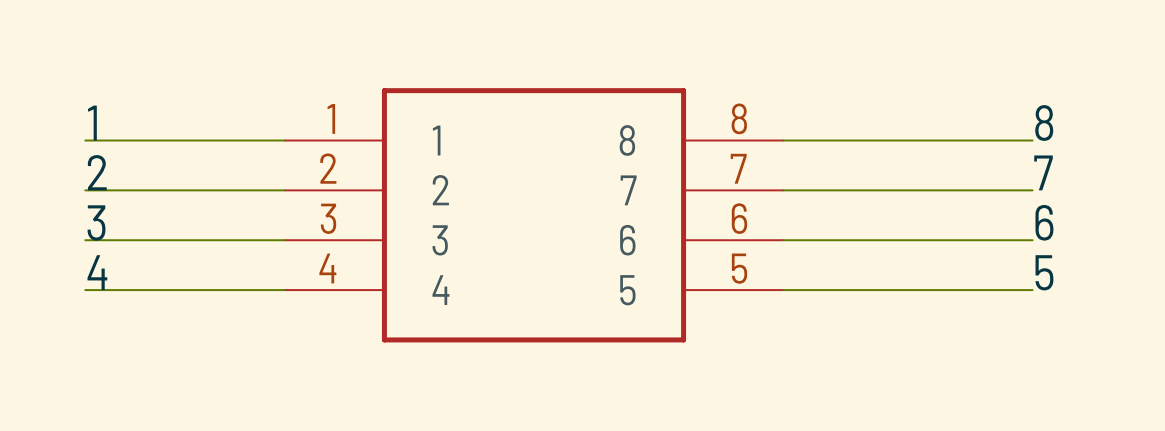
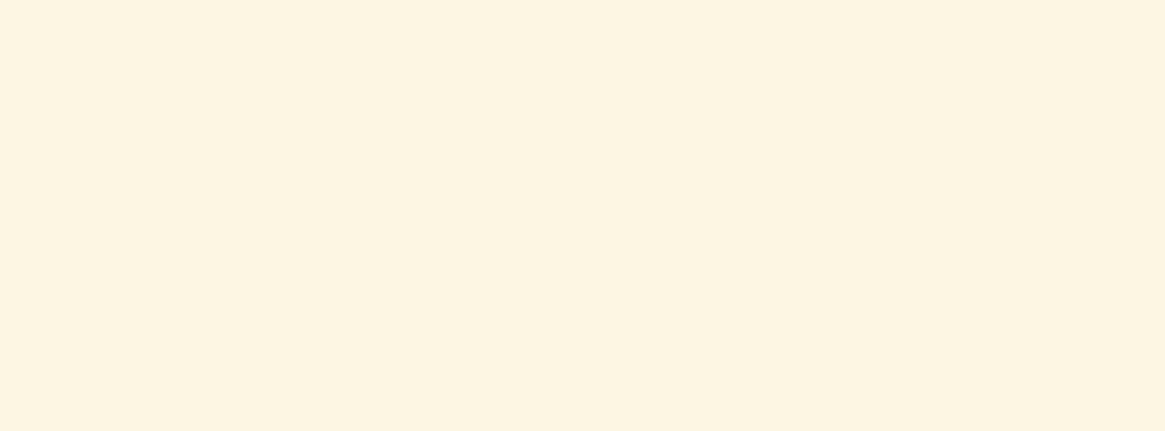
label: 1 (92, 123) -> none
label: 8 (1044, 123) -> none
wire: (85, 140) (284, 140) -> none
wire: (783, 140) (1032, 140) -> none
label: 2 (97, 172) -> none
label: 7 (1043, 172) -> none
wire: (85, 190) (284, 190) -> none
wire: (783, 190) (1032, 190) -> none
part: (534, 215) -> none
label: 3 (96, 222) -> none
label: 6 (1044, 222) -> none
wire: (85, 240) (284, 240) -> none
wire: (783, 240) (1032, 240) -> none
label: 4 (97, 272) -> none
label: 5 (1044, 272) -> none
wire: (85, 290) (284, 290) -> none
wire: (783, 290) (1032, 290) -> none

